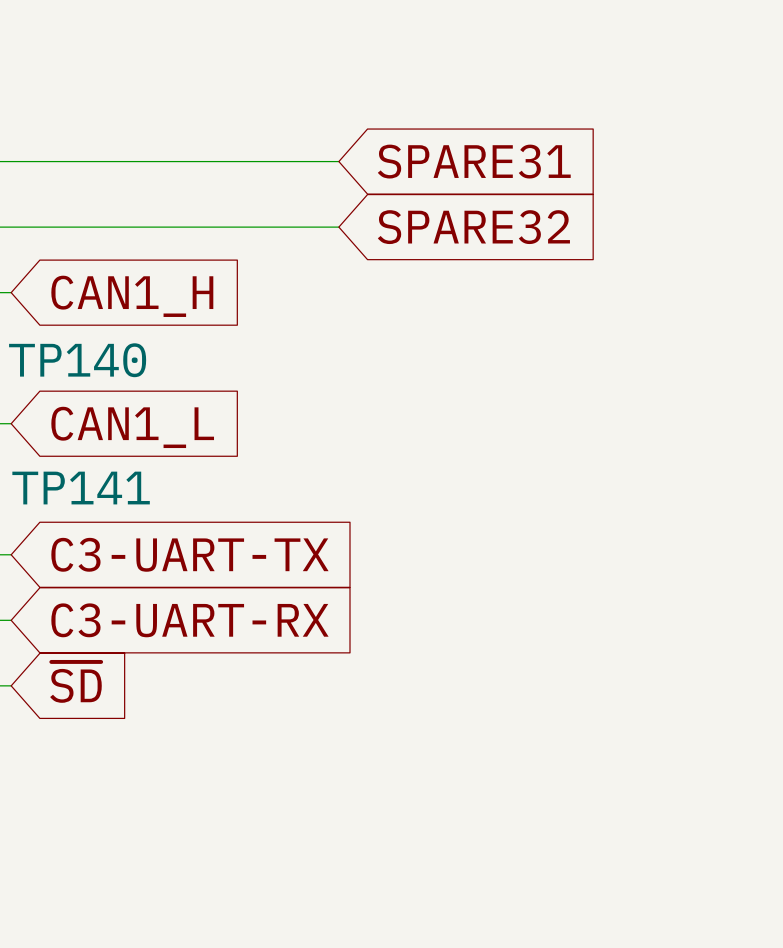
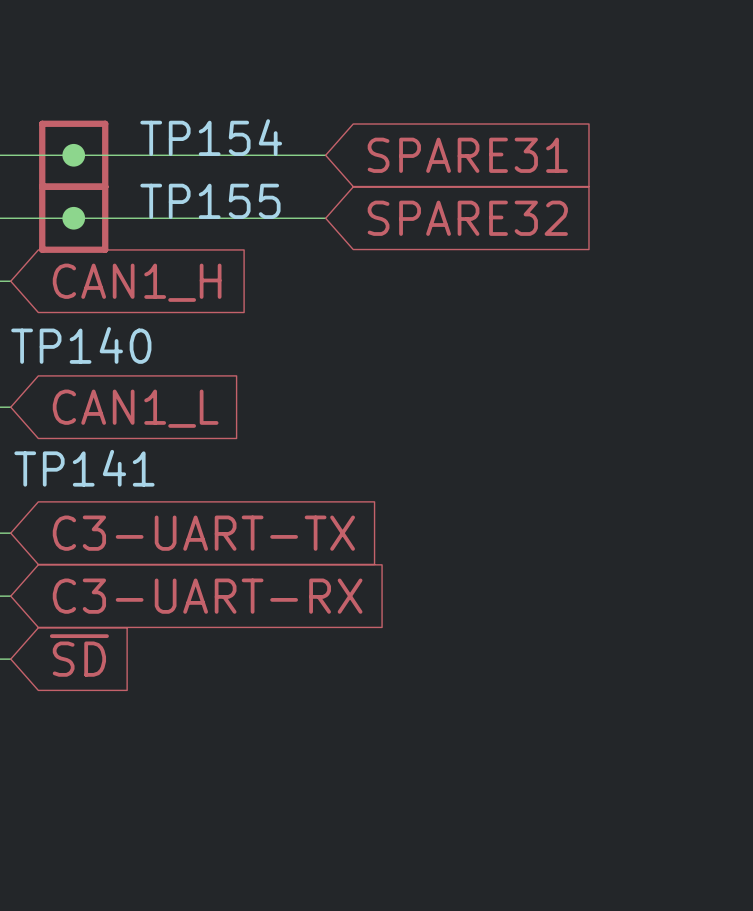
junction: none -> (73, 155)
TP154: none -> (73, 155)
junction: none -> (73, 218)
TP155: none -> (73, 218)

